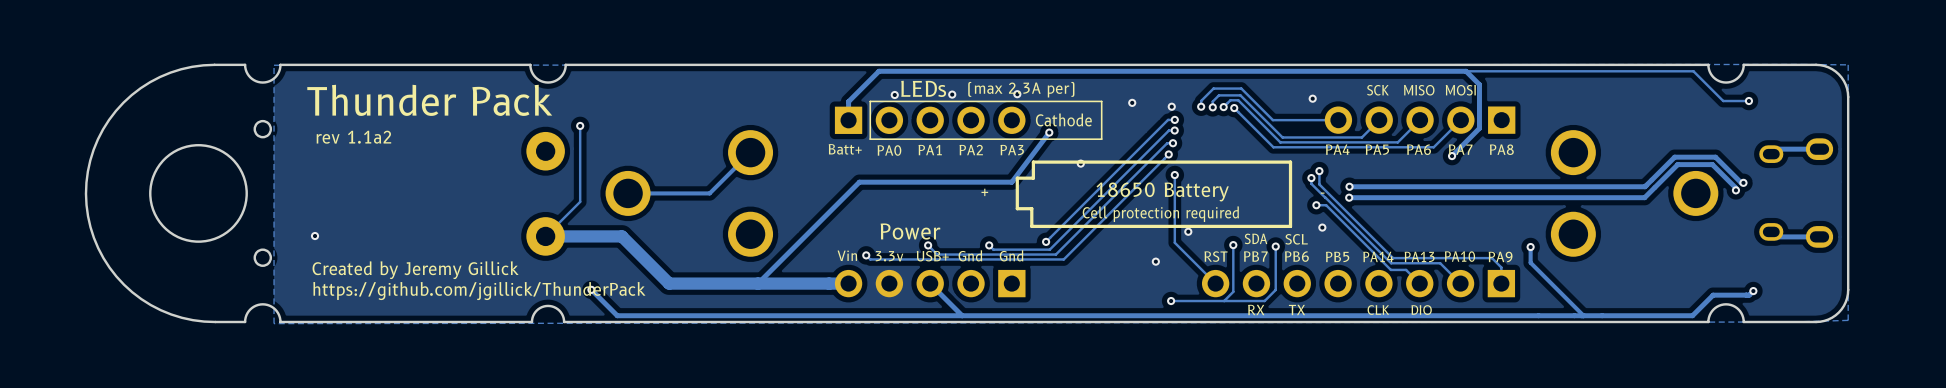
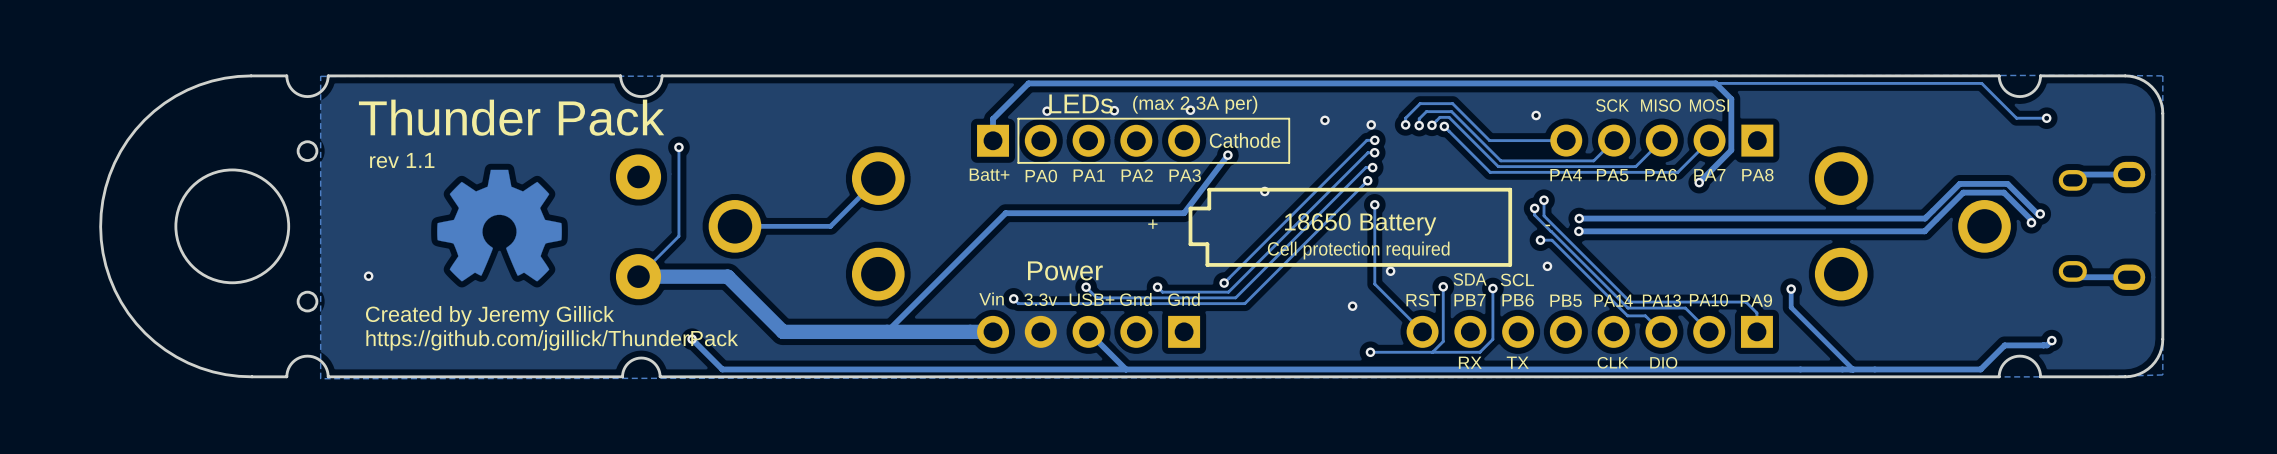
text: rev 1.1a2 (353, 137) -> rev 1.1 (402, 160)
drawing: none -> [437, 169, 562, 282]

